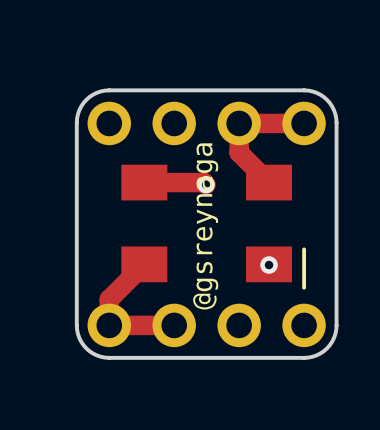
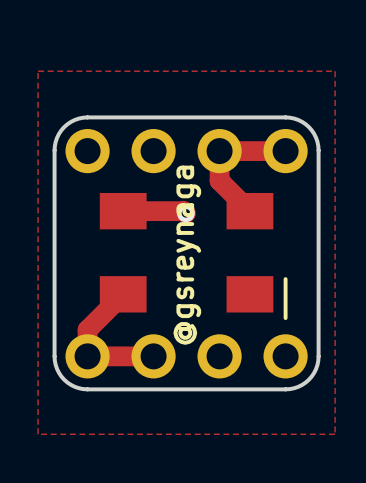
zone outline: none -> (38, 71) (335, 71) (335, 434) (38, 434) (38, 71)
via: (269, 265) -> none

